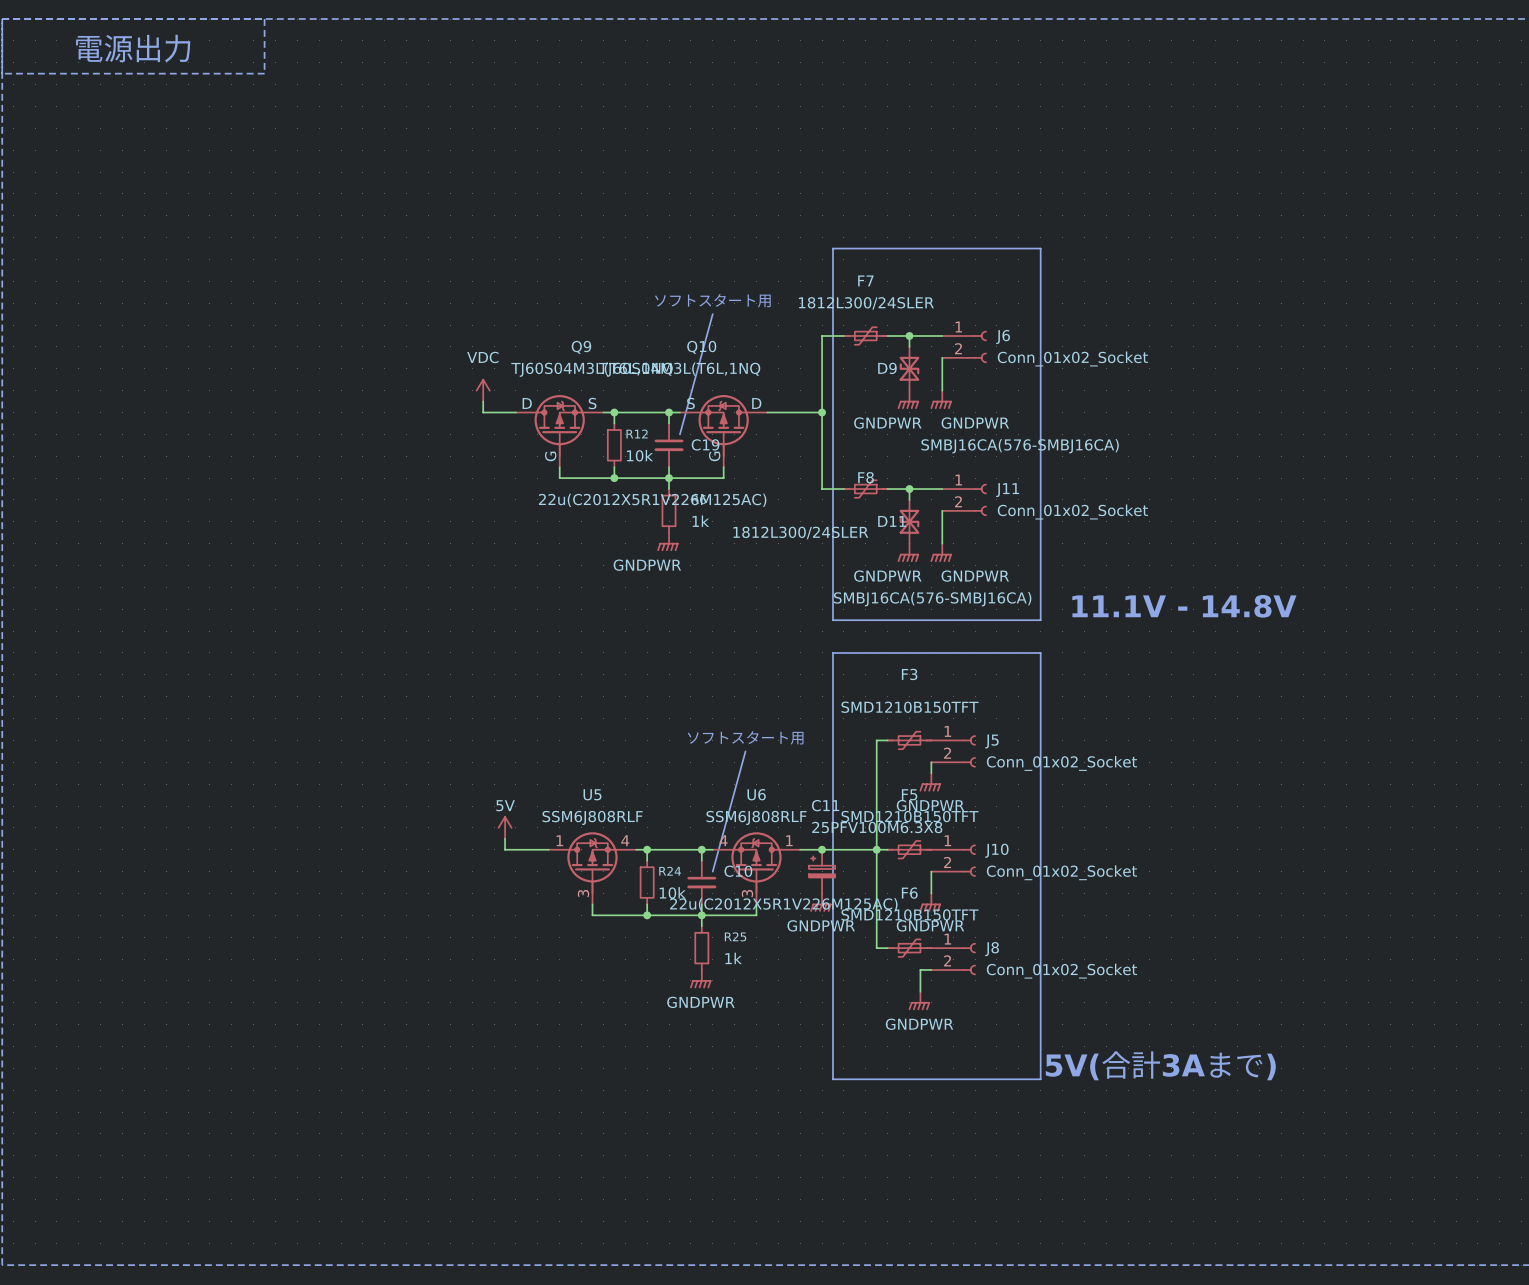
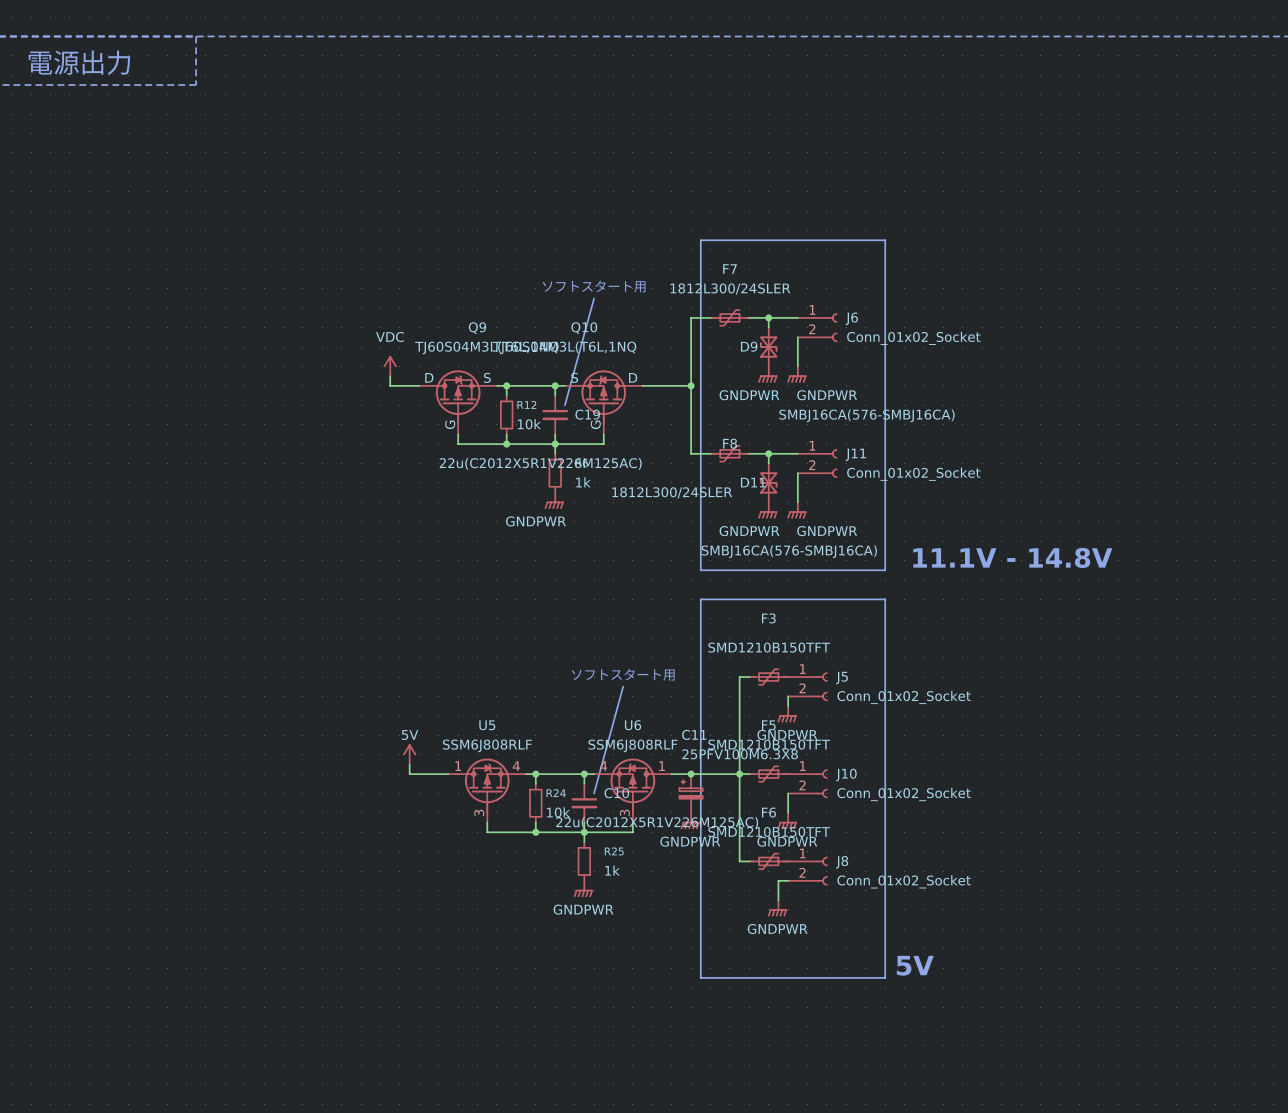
text: none -> 5V (915, 965)
text: 5V(合計3Aまで) (1160, 1065) -> none

